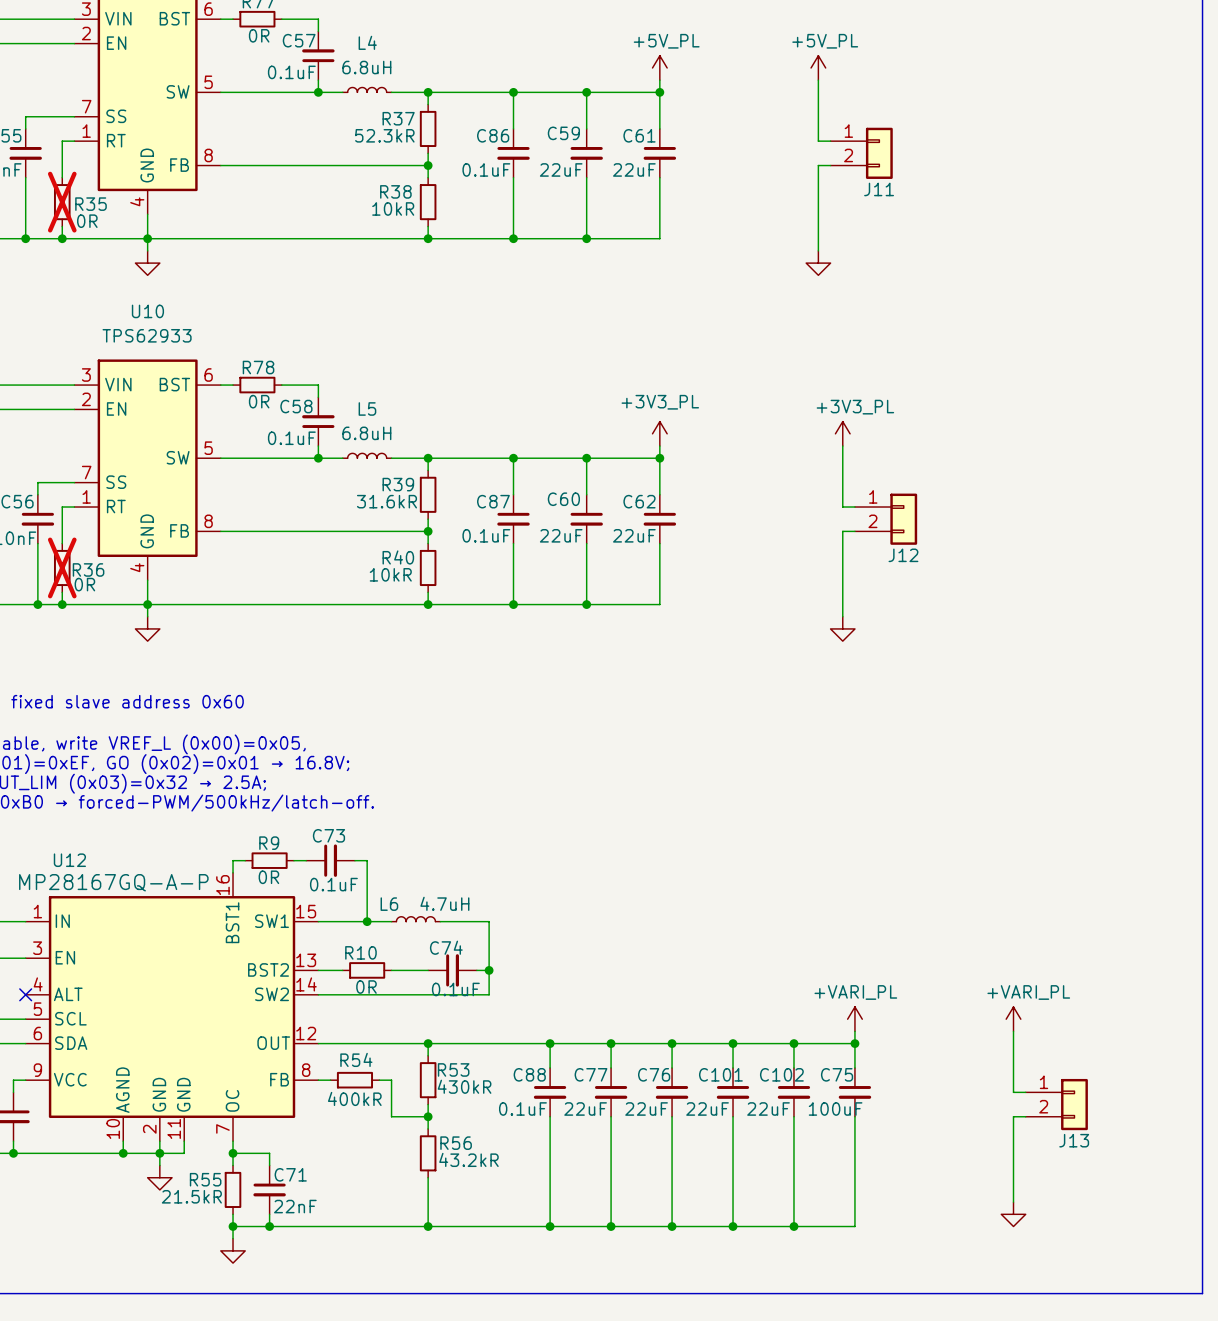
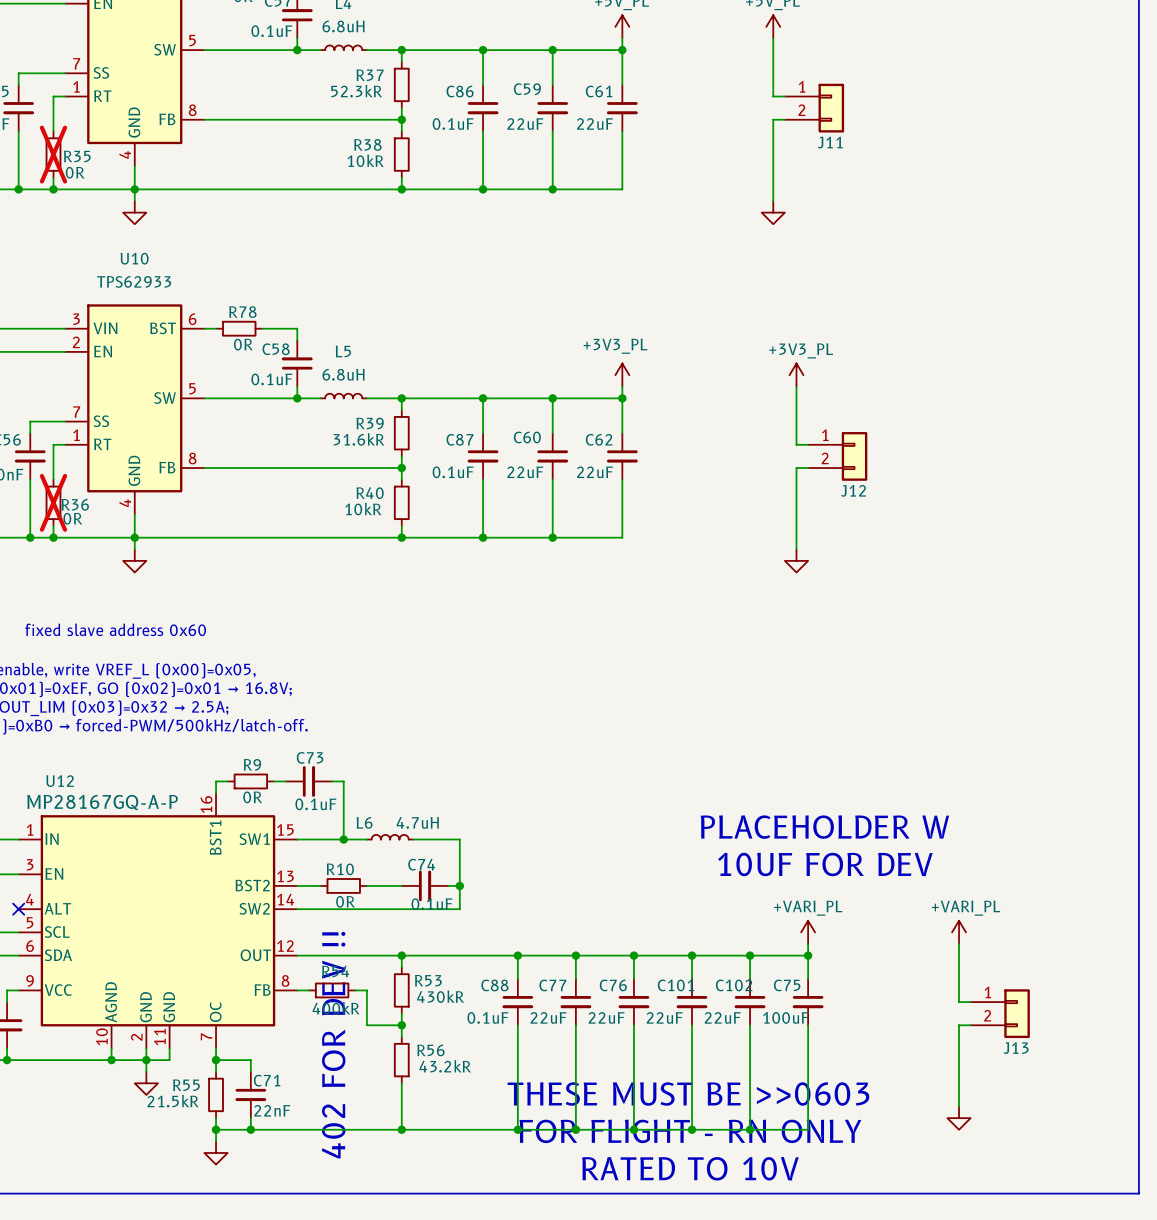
text: none -> PLACEHOLDER W (824, 827)
text: none -> 10UF FOR DEV (825, 864)
text: none -> 402 FOR DEV !! (333, 1045)
text: none -> THESE MUST BE >>0603 (688, 1093)
text: none -> FOR FLIGHT - RN ONLY (690, 1131)
text: none -> RATED TO 10V (690, 1168)

